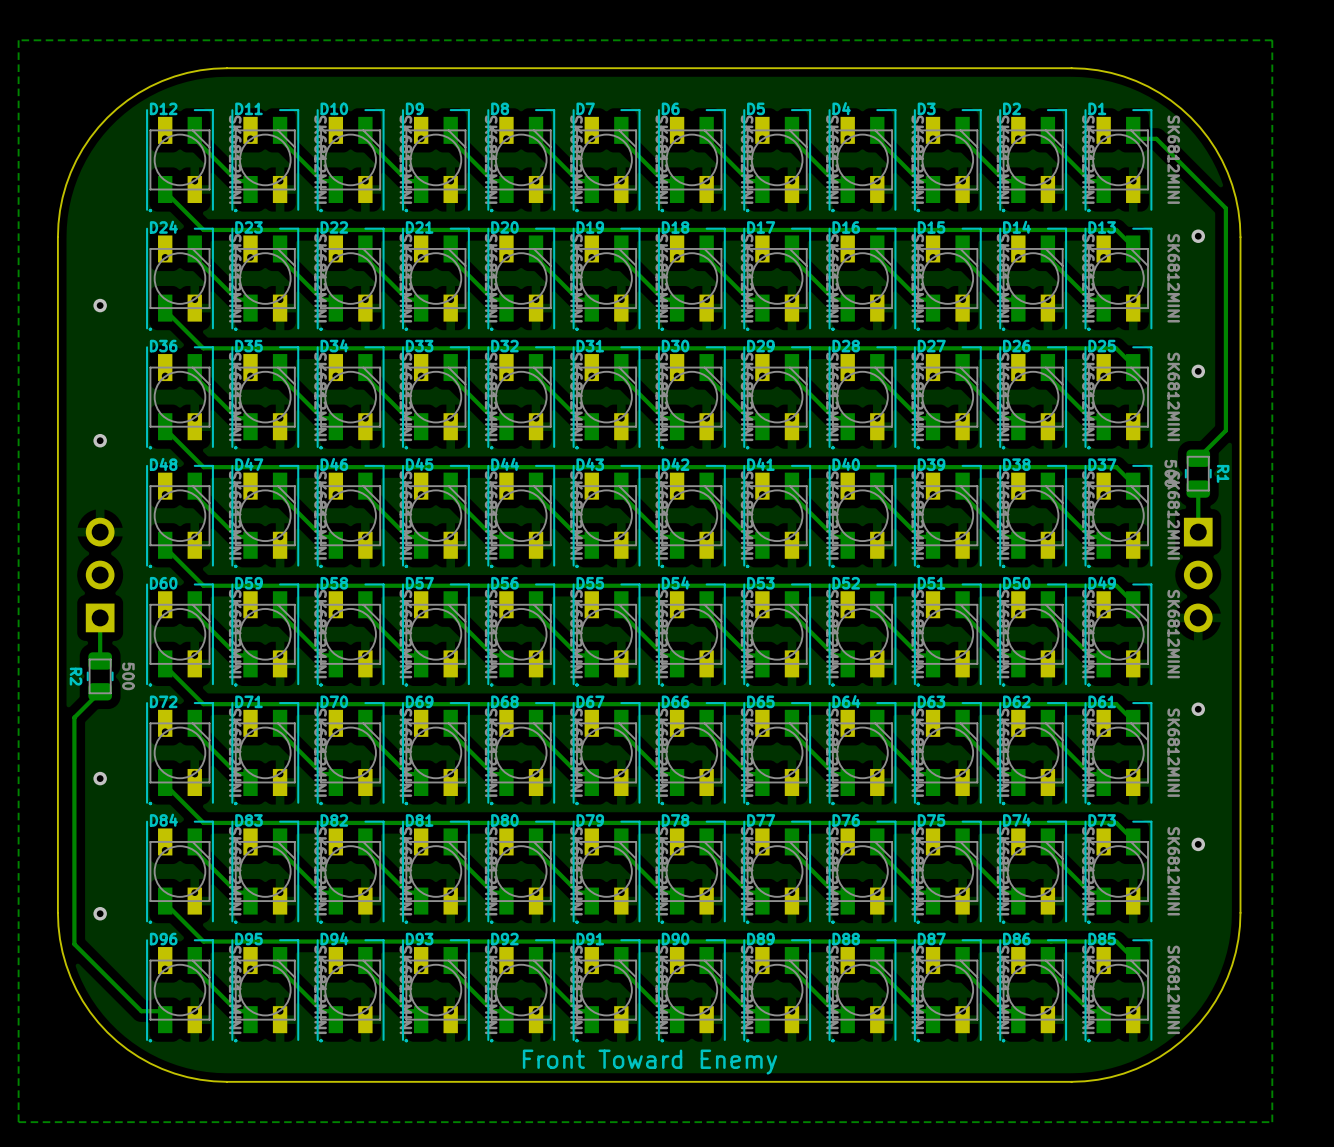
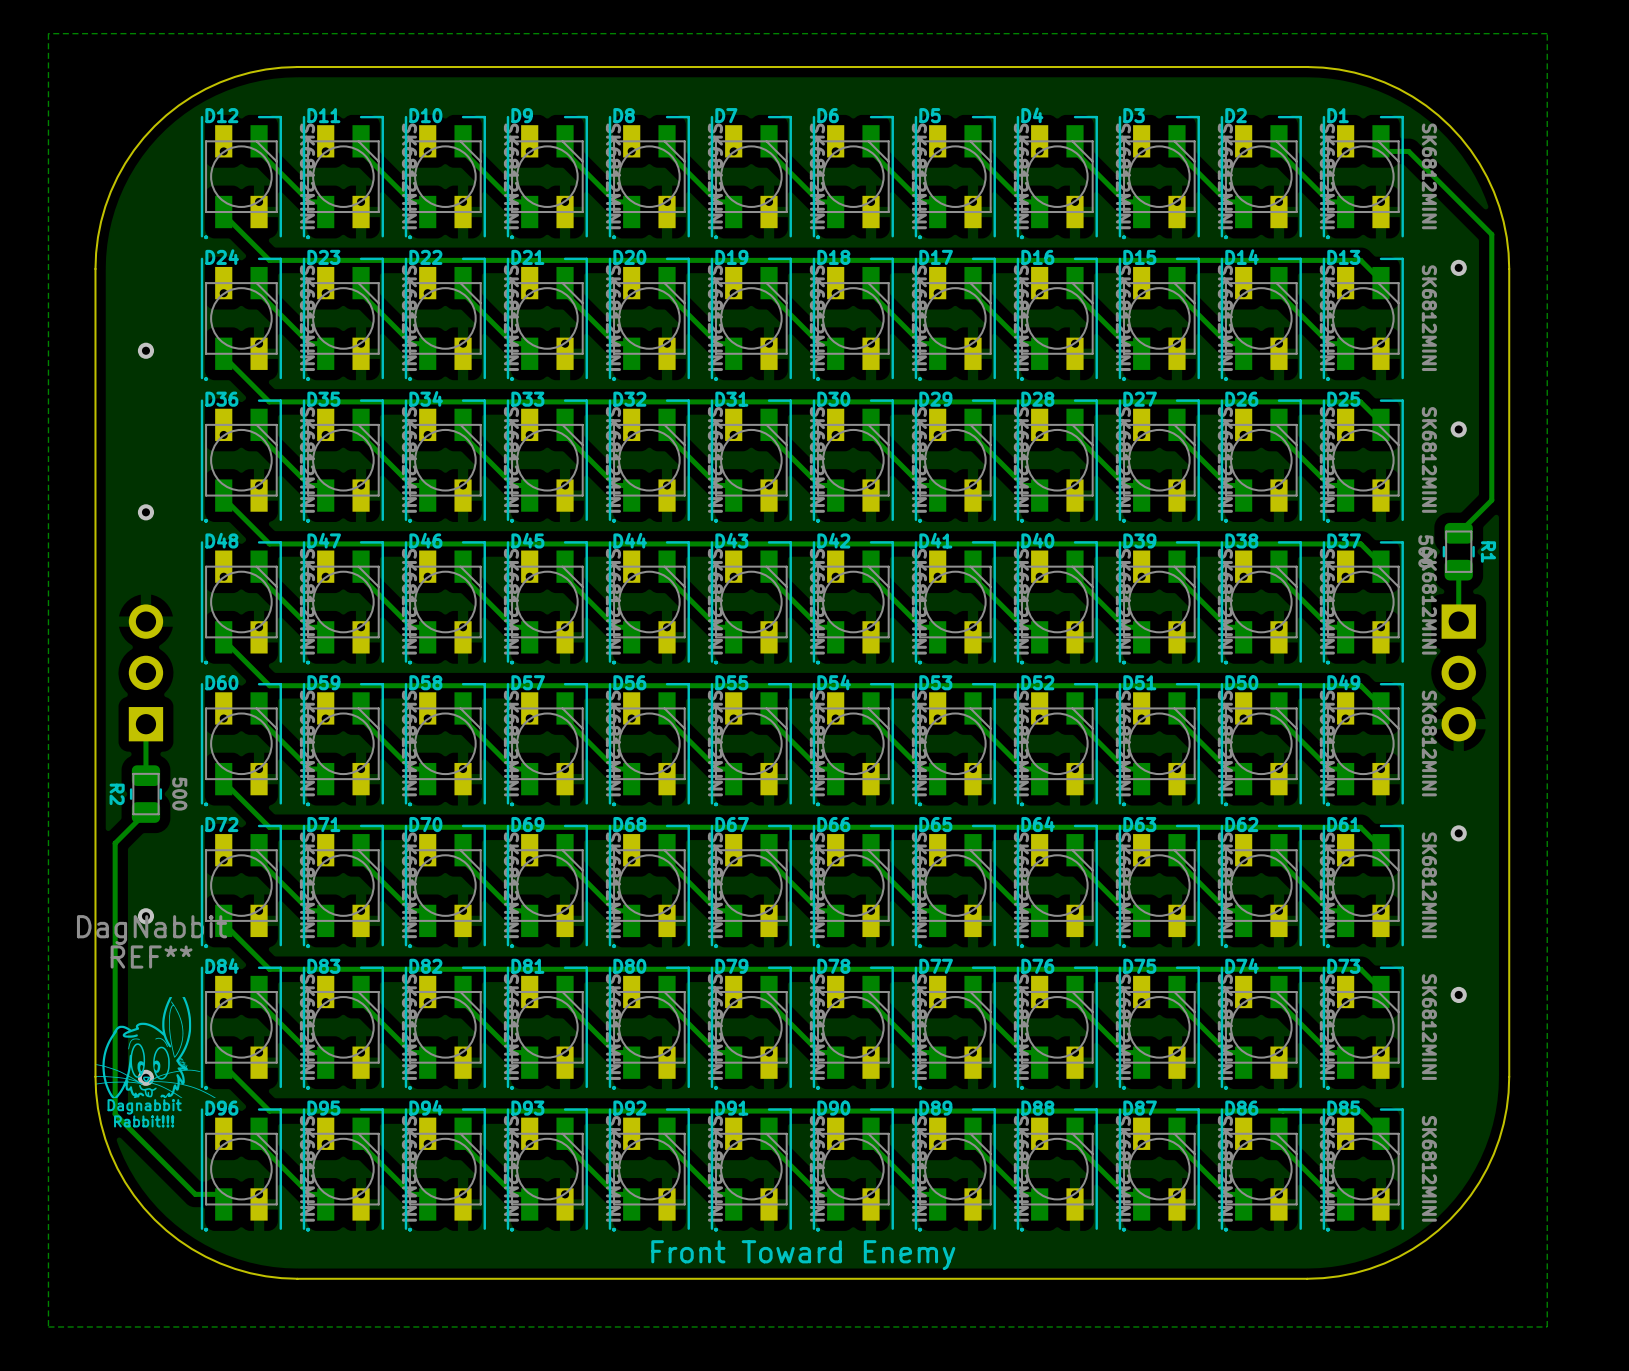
REF**: none -> DagNabbit (156, 1047)

